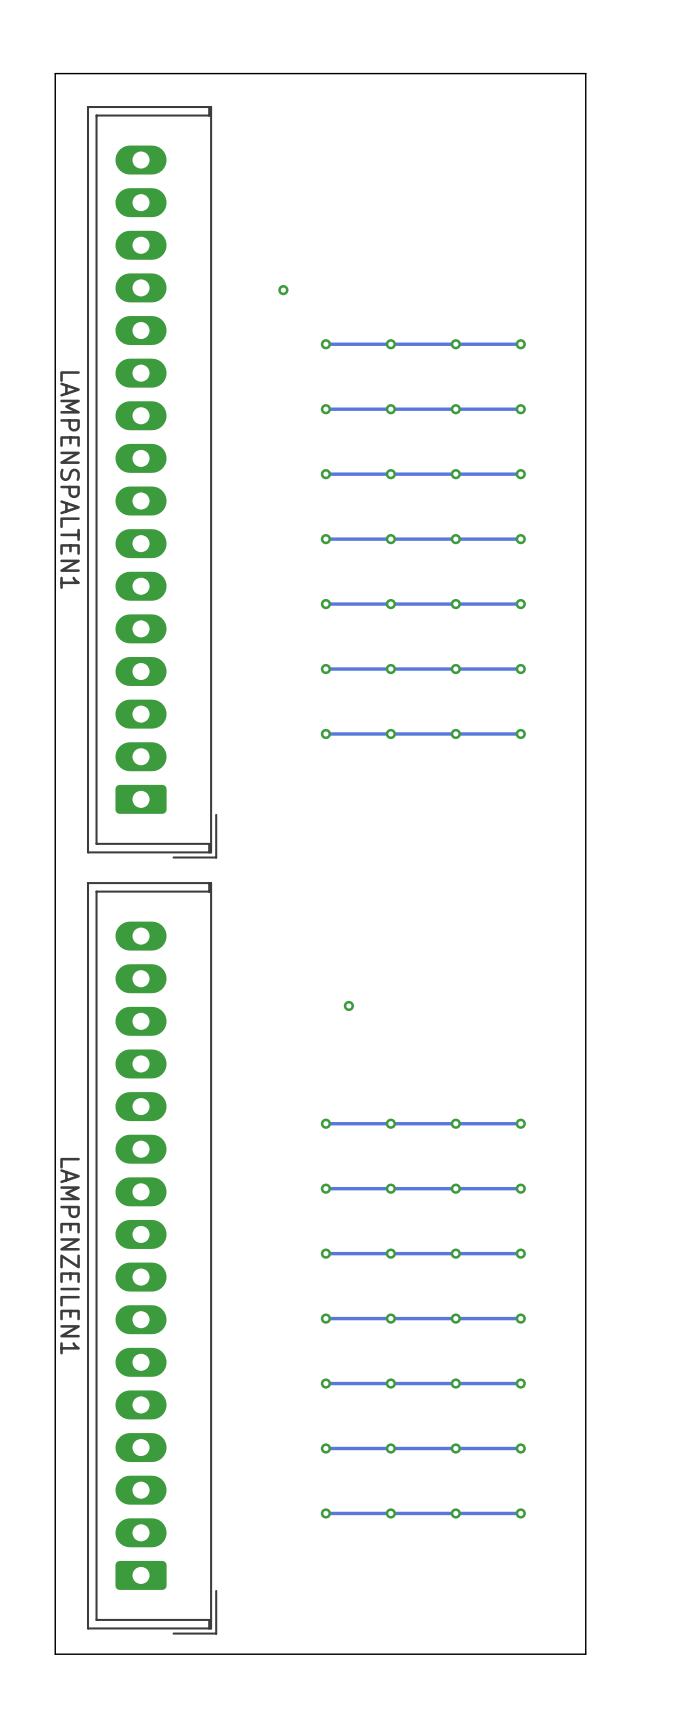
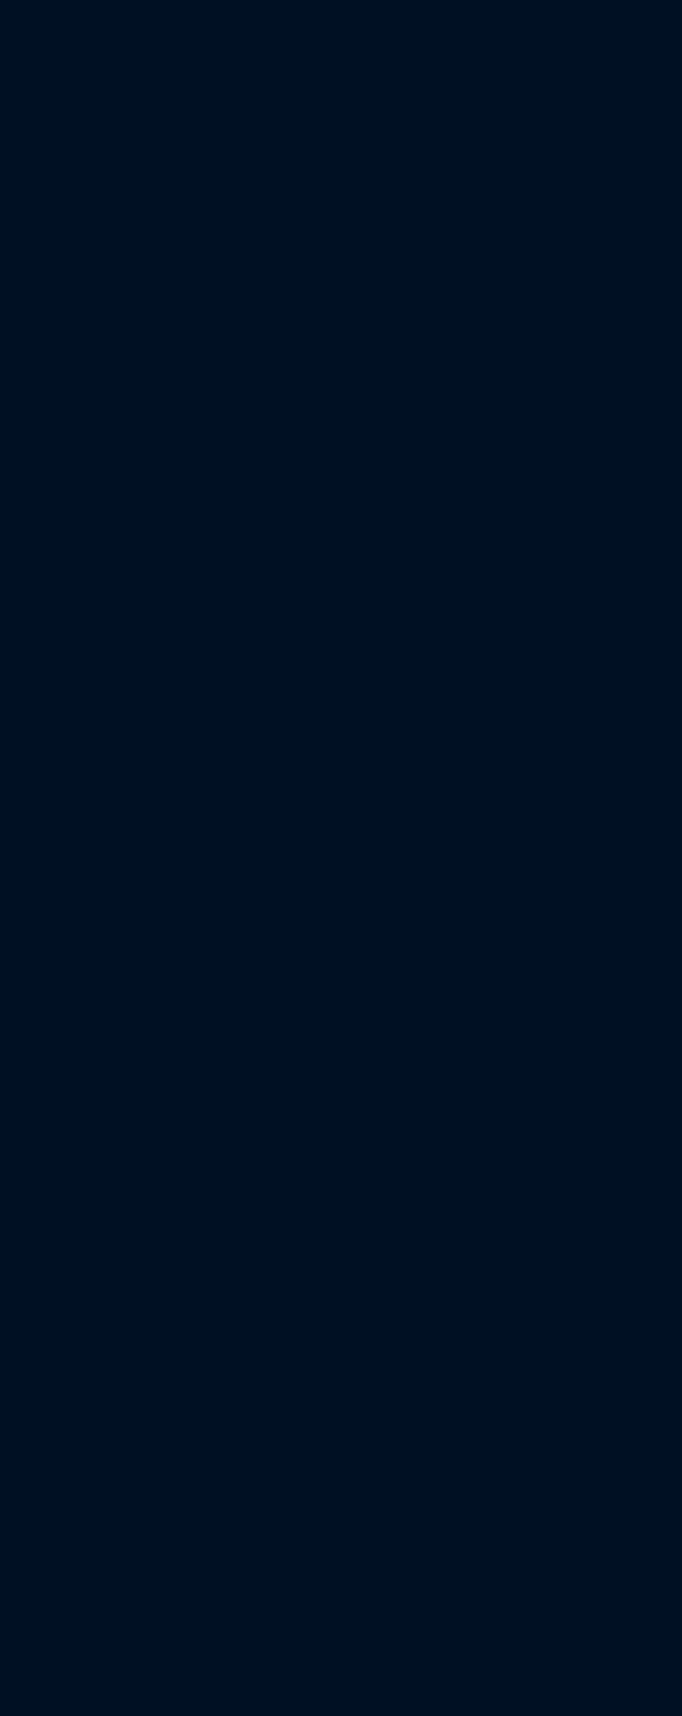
board edge: (585, 73) (55, 73) (55, 1654) (585, 1654) (585, 73) -> none
via: (283, 290) -> none
via: (325, 344) -> none
via: (390, 344) -> none
via: (455, 344) -> none
track: (520, 344) (325, 344) -> none
via: (520, 344) -> none
via: (325, 409) -> none
via: (390, 409) -> none
via: (455, 409) -> none
track: (520, 409) (325, 409) -> none
via: (520, 409) -> none
via: (325, 474) -> none
via: (390, 474) -> none
via: (455, 474) -> none
track: (520, 474) (325, 474) -> none
via: (520, 474) -> none
LAMPENSPALTEN1: (152, 482) -> none
via: (325, 539) -> none
via: (390, 539) -> none
via: (455, 539) -> none
track: (520, 539) (325, 539) -> none
via: (520, 539) -> none
via: (325, 604) -> none
via: (390, 604) -> none
via: (455, 604) -> none
track: (520, 604) (325, 604) -> none
via: (520, 604) -> none
via: (325, 669) -> none
via: (390, 669) -> none
via: (455, 669) -> none
track: (520, 669) (325, 669) -> none
via: (520, 669) -> none
via: (325, 733) -> none
via: (390, 733) -> none
via: (455, 733) -> none
track: (520, 733) (325, 733) -> none
via: (520, 733) -> none
via: (348, 1005) -> none
via: (325, 1123) -> none
via: (390, 1123) -> none
via: (455, 1123) -> none
track: (520, 1123) (325, 1123) -> none
via: (520, 1123) -> none
via: (325, 1188) -> none
via: (390, 1188) -> none
via: (455, 1188) -> none
track: (520, 1188) (325, 1188) -> none
via: (520, 1188) -> none
via: (325, 1253) -> none
via: (390, 1253) -> none
via: (455, 1253) -> none
track: (520, 1253) (325, 1253) -> none
via: (520, 1253) -> none
LAMPENZEILEN1: (152, 1258) -> none
via: (325, 1318) -> none
via: (390, 1318) -> none
via: (455, 1318) -> none
track: (520, 1318) (325, 1318) -> none
via: (520, 1318) -> none
via: (325, 1383) -> none
via: (390, 1383) -> none
via: (455, 1383) -> none
track: (520, 1383) (325, 1383) -> none
via: (520, 1383) -> none
via: (325, 1448) -> none
via: (390, 1448) -> none
via: (455, 1448) -> none
track: (520, 1448) (325, 1448) -> none
via: (520, 1448) -> none
via: (325, 1513) -> none
via: (390, 1513) -> none
via: (455, 1513) -> none
track: (520, 1513) (325, 1513) -> none
via: (520, 1513) -> none

